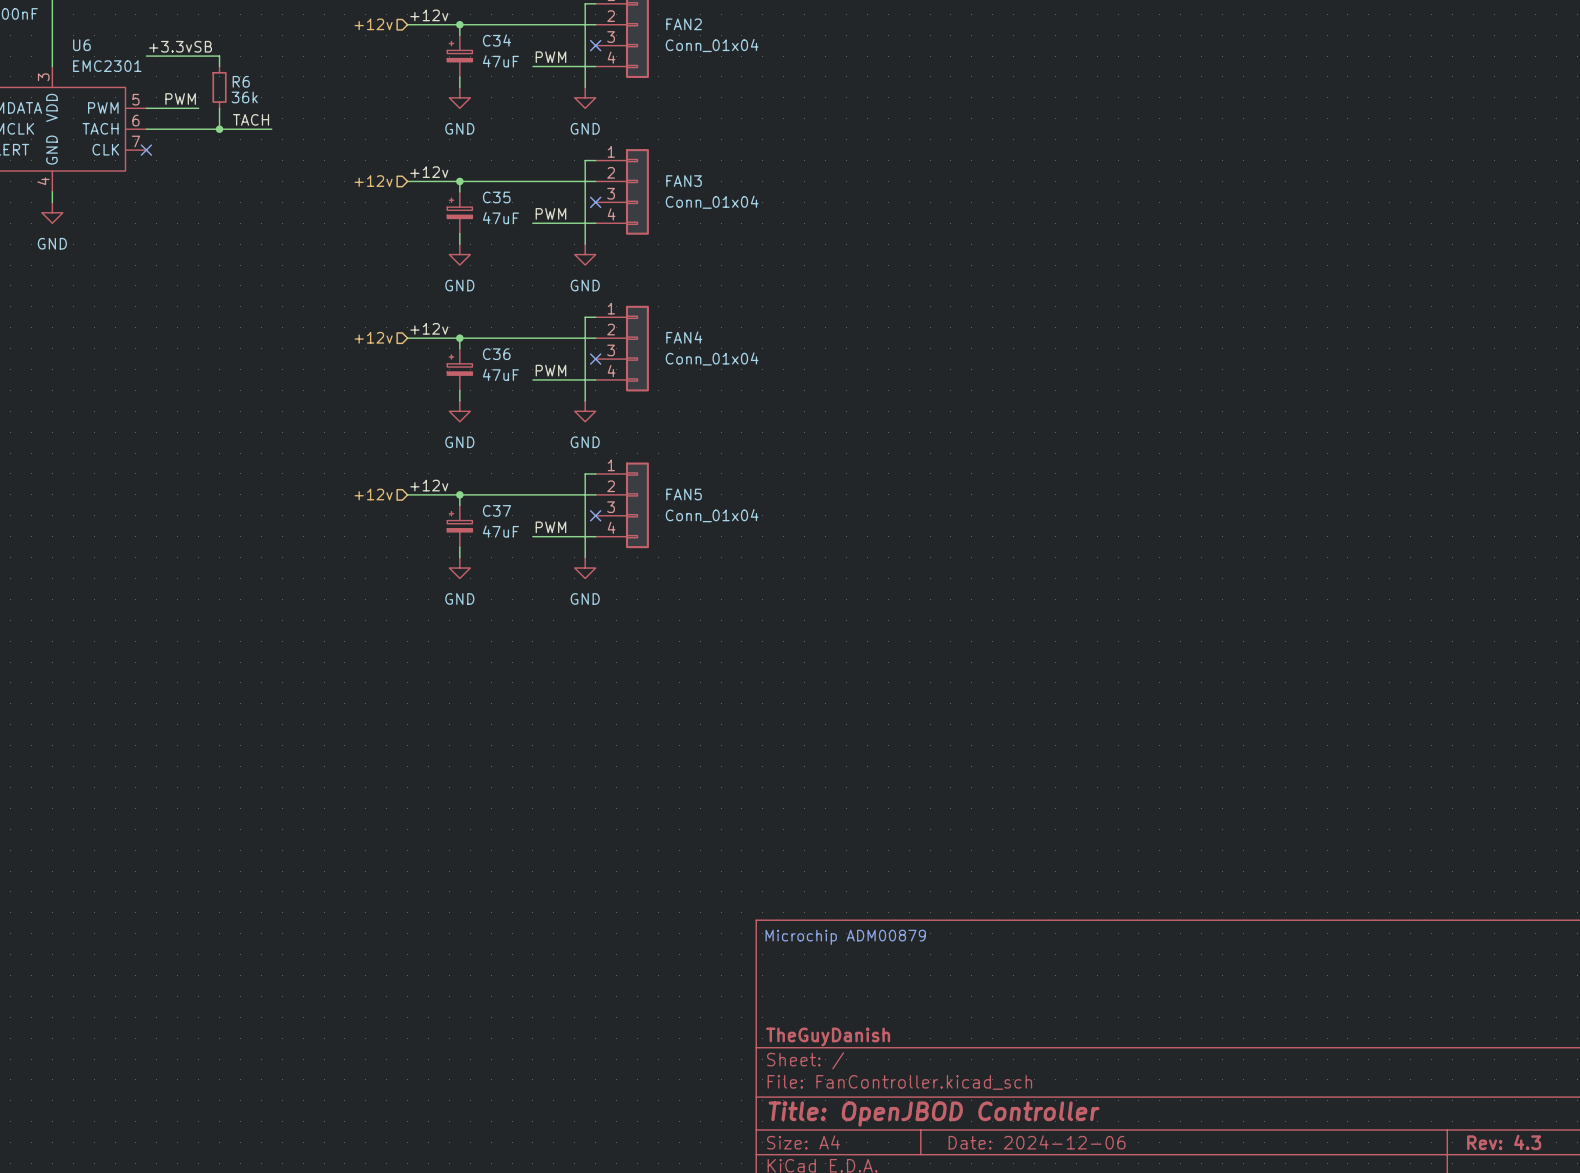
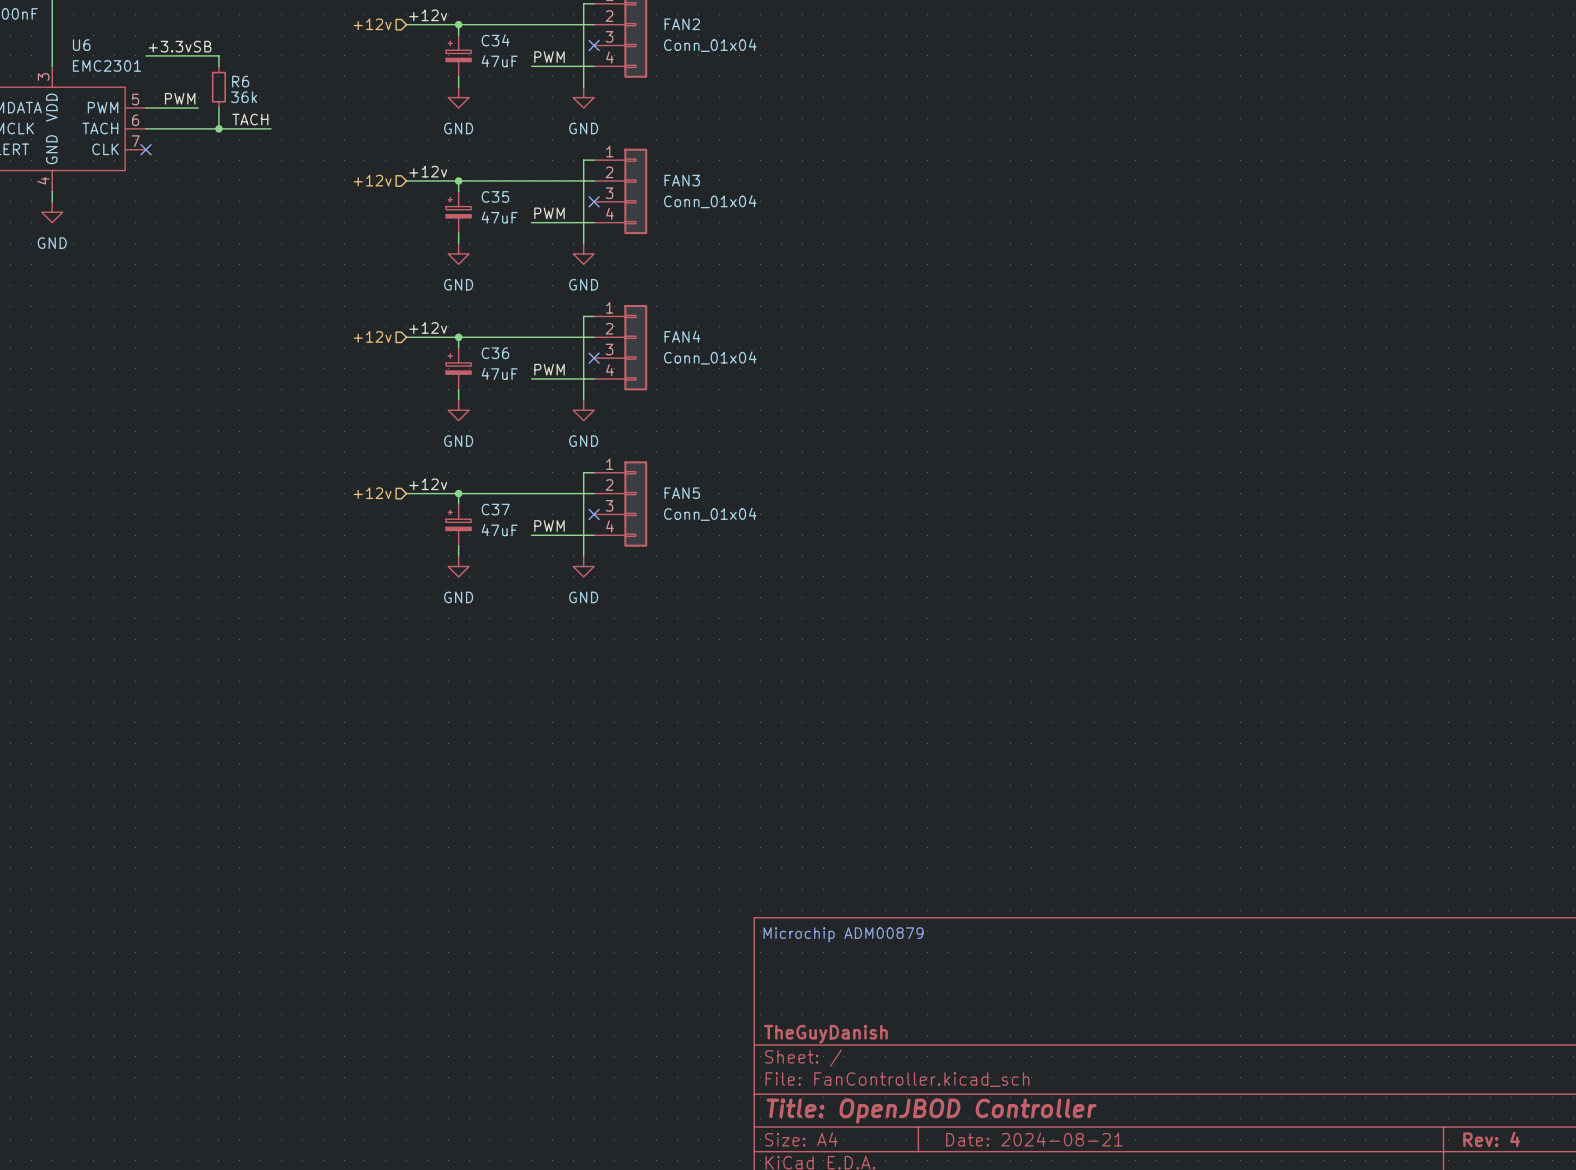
title block: Date: 2024-12-06 (1037, 1142) -> Date: 2024-08-21 (1034, 1139)
title block: Rev: 4.3 (1504, 1142) -> Rev: 4 (1491, 1139)

